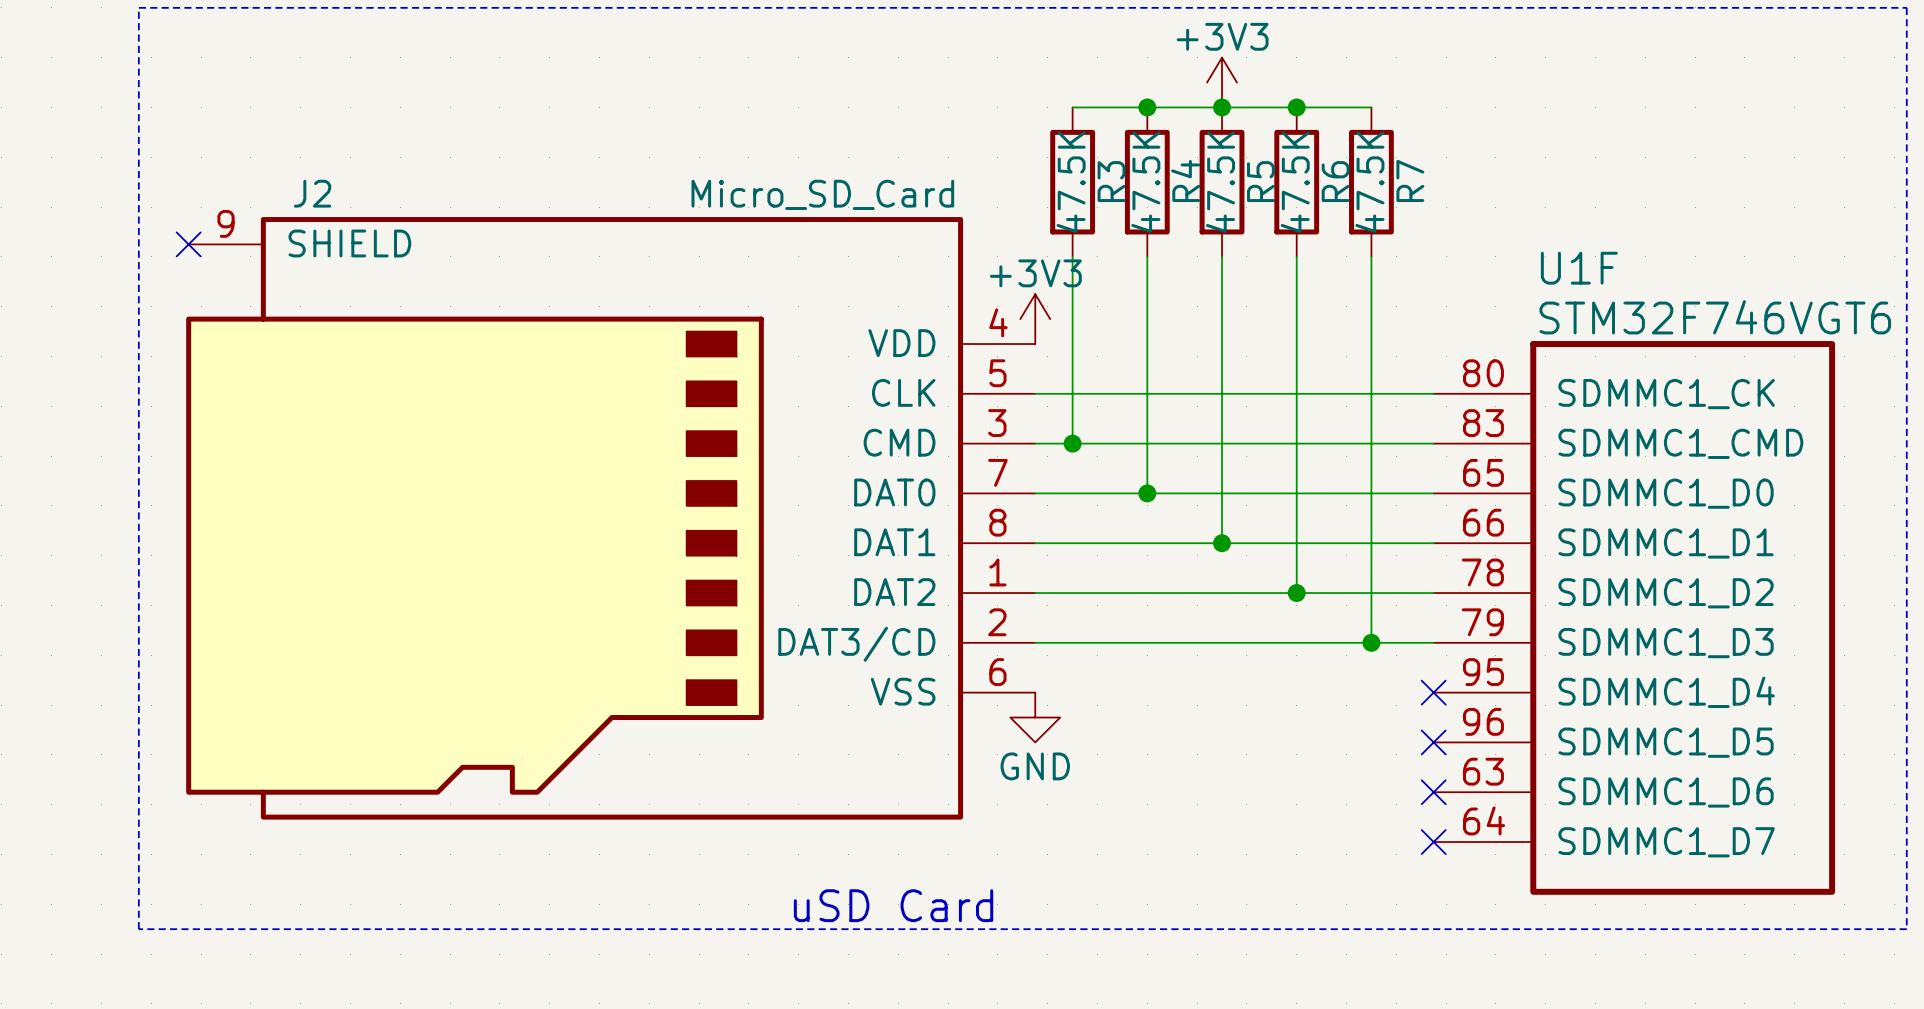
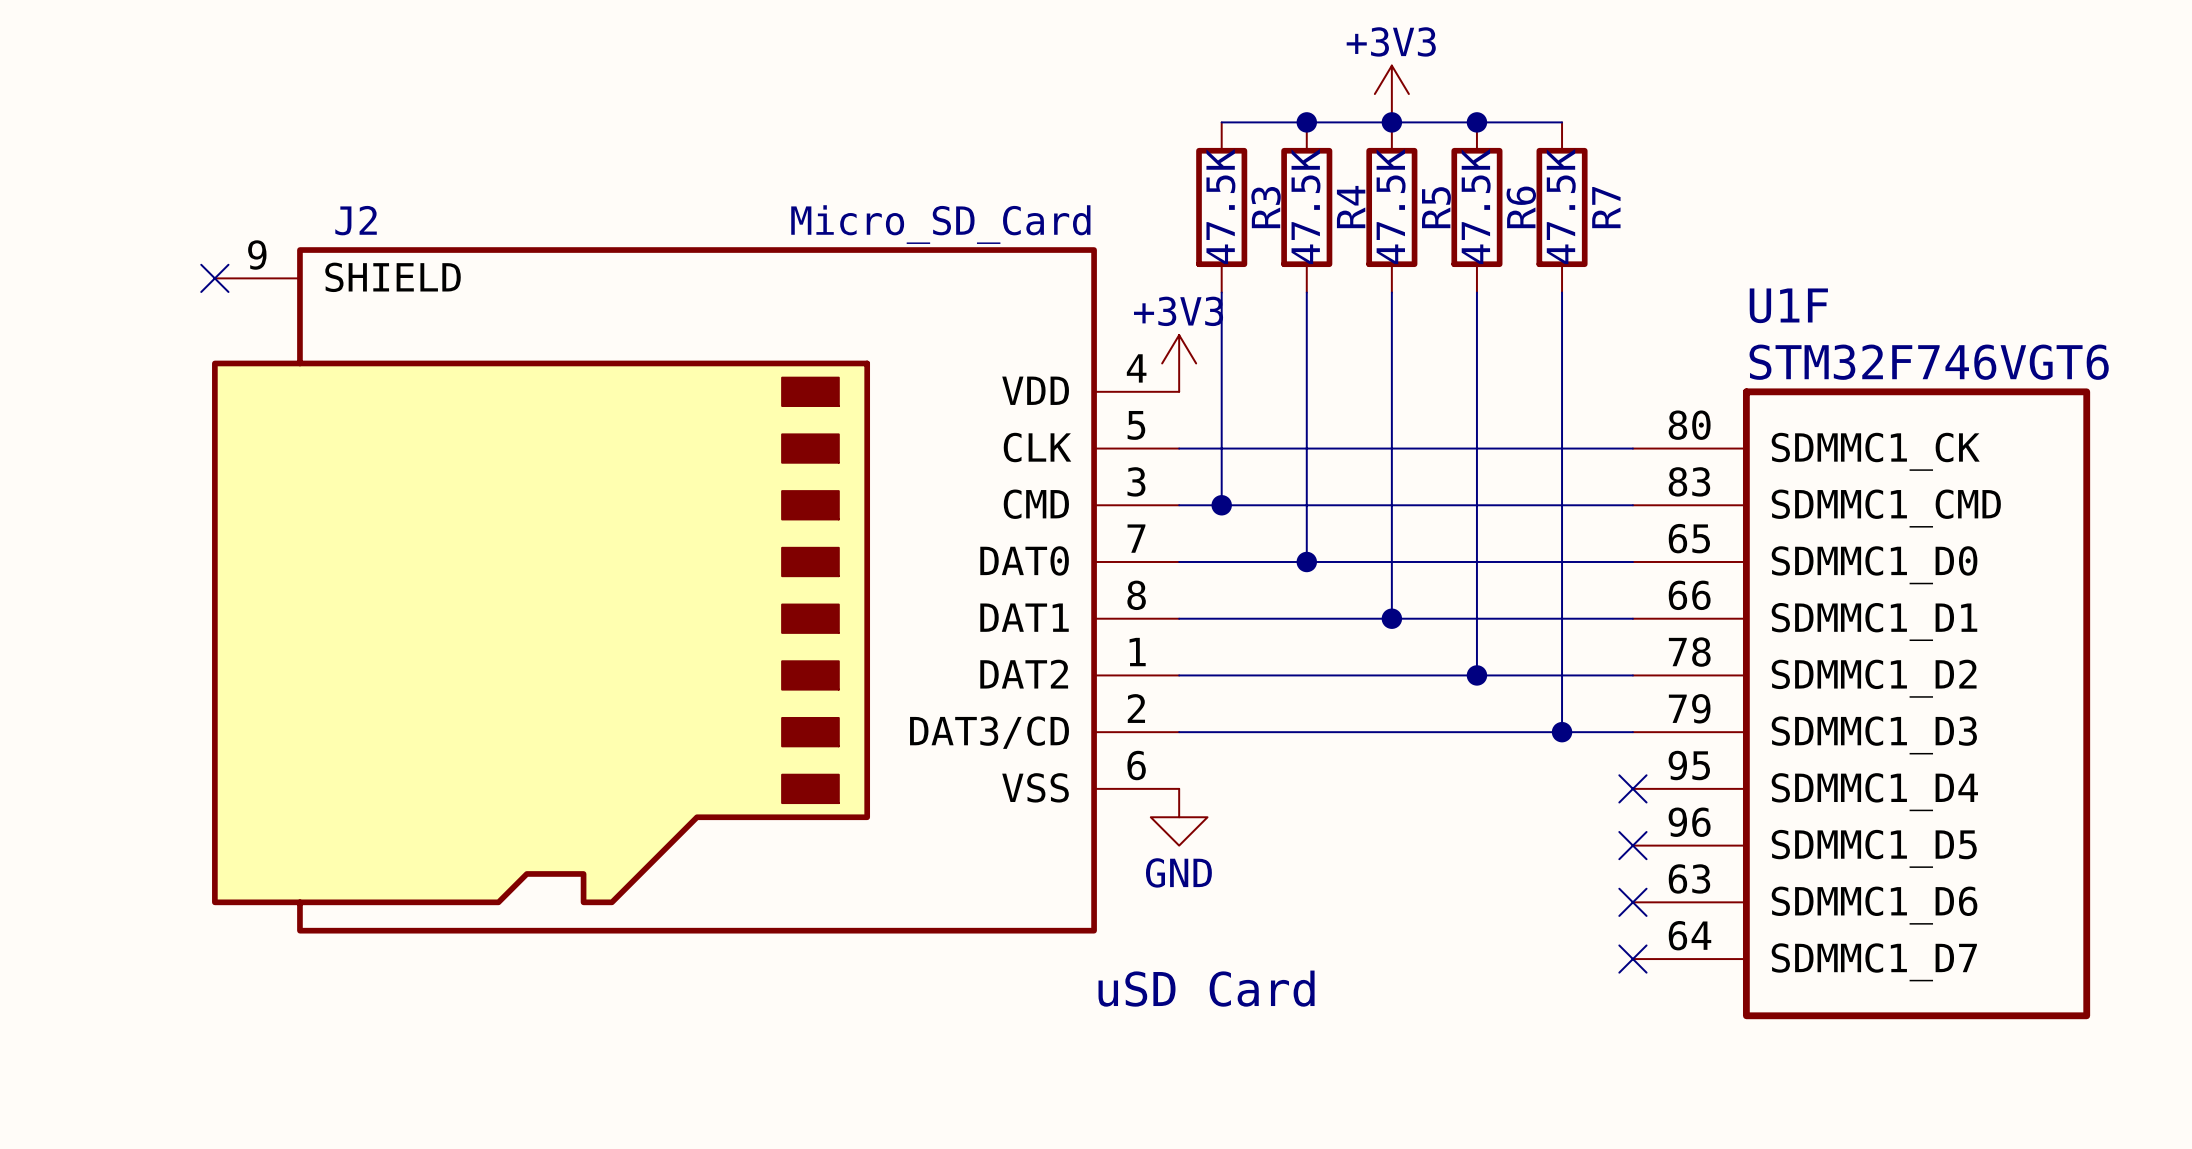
line: (138, 7) (1906, 7) (1906, 929) (138, 929) (138, 7) -> none
text position: uSD Card (893, 905) -> uSD Card (1206, 988)

